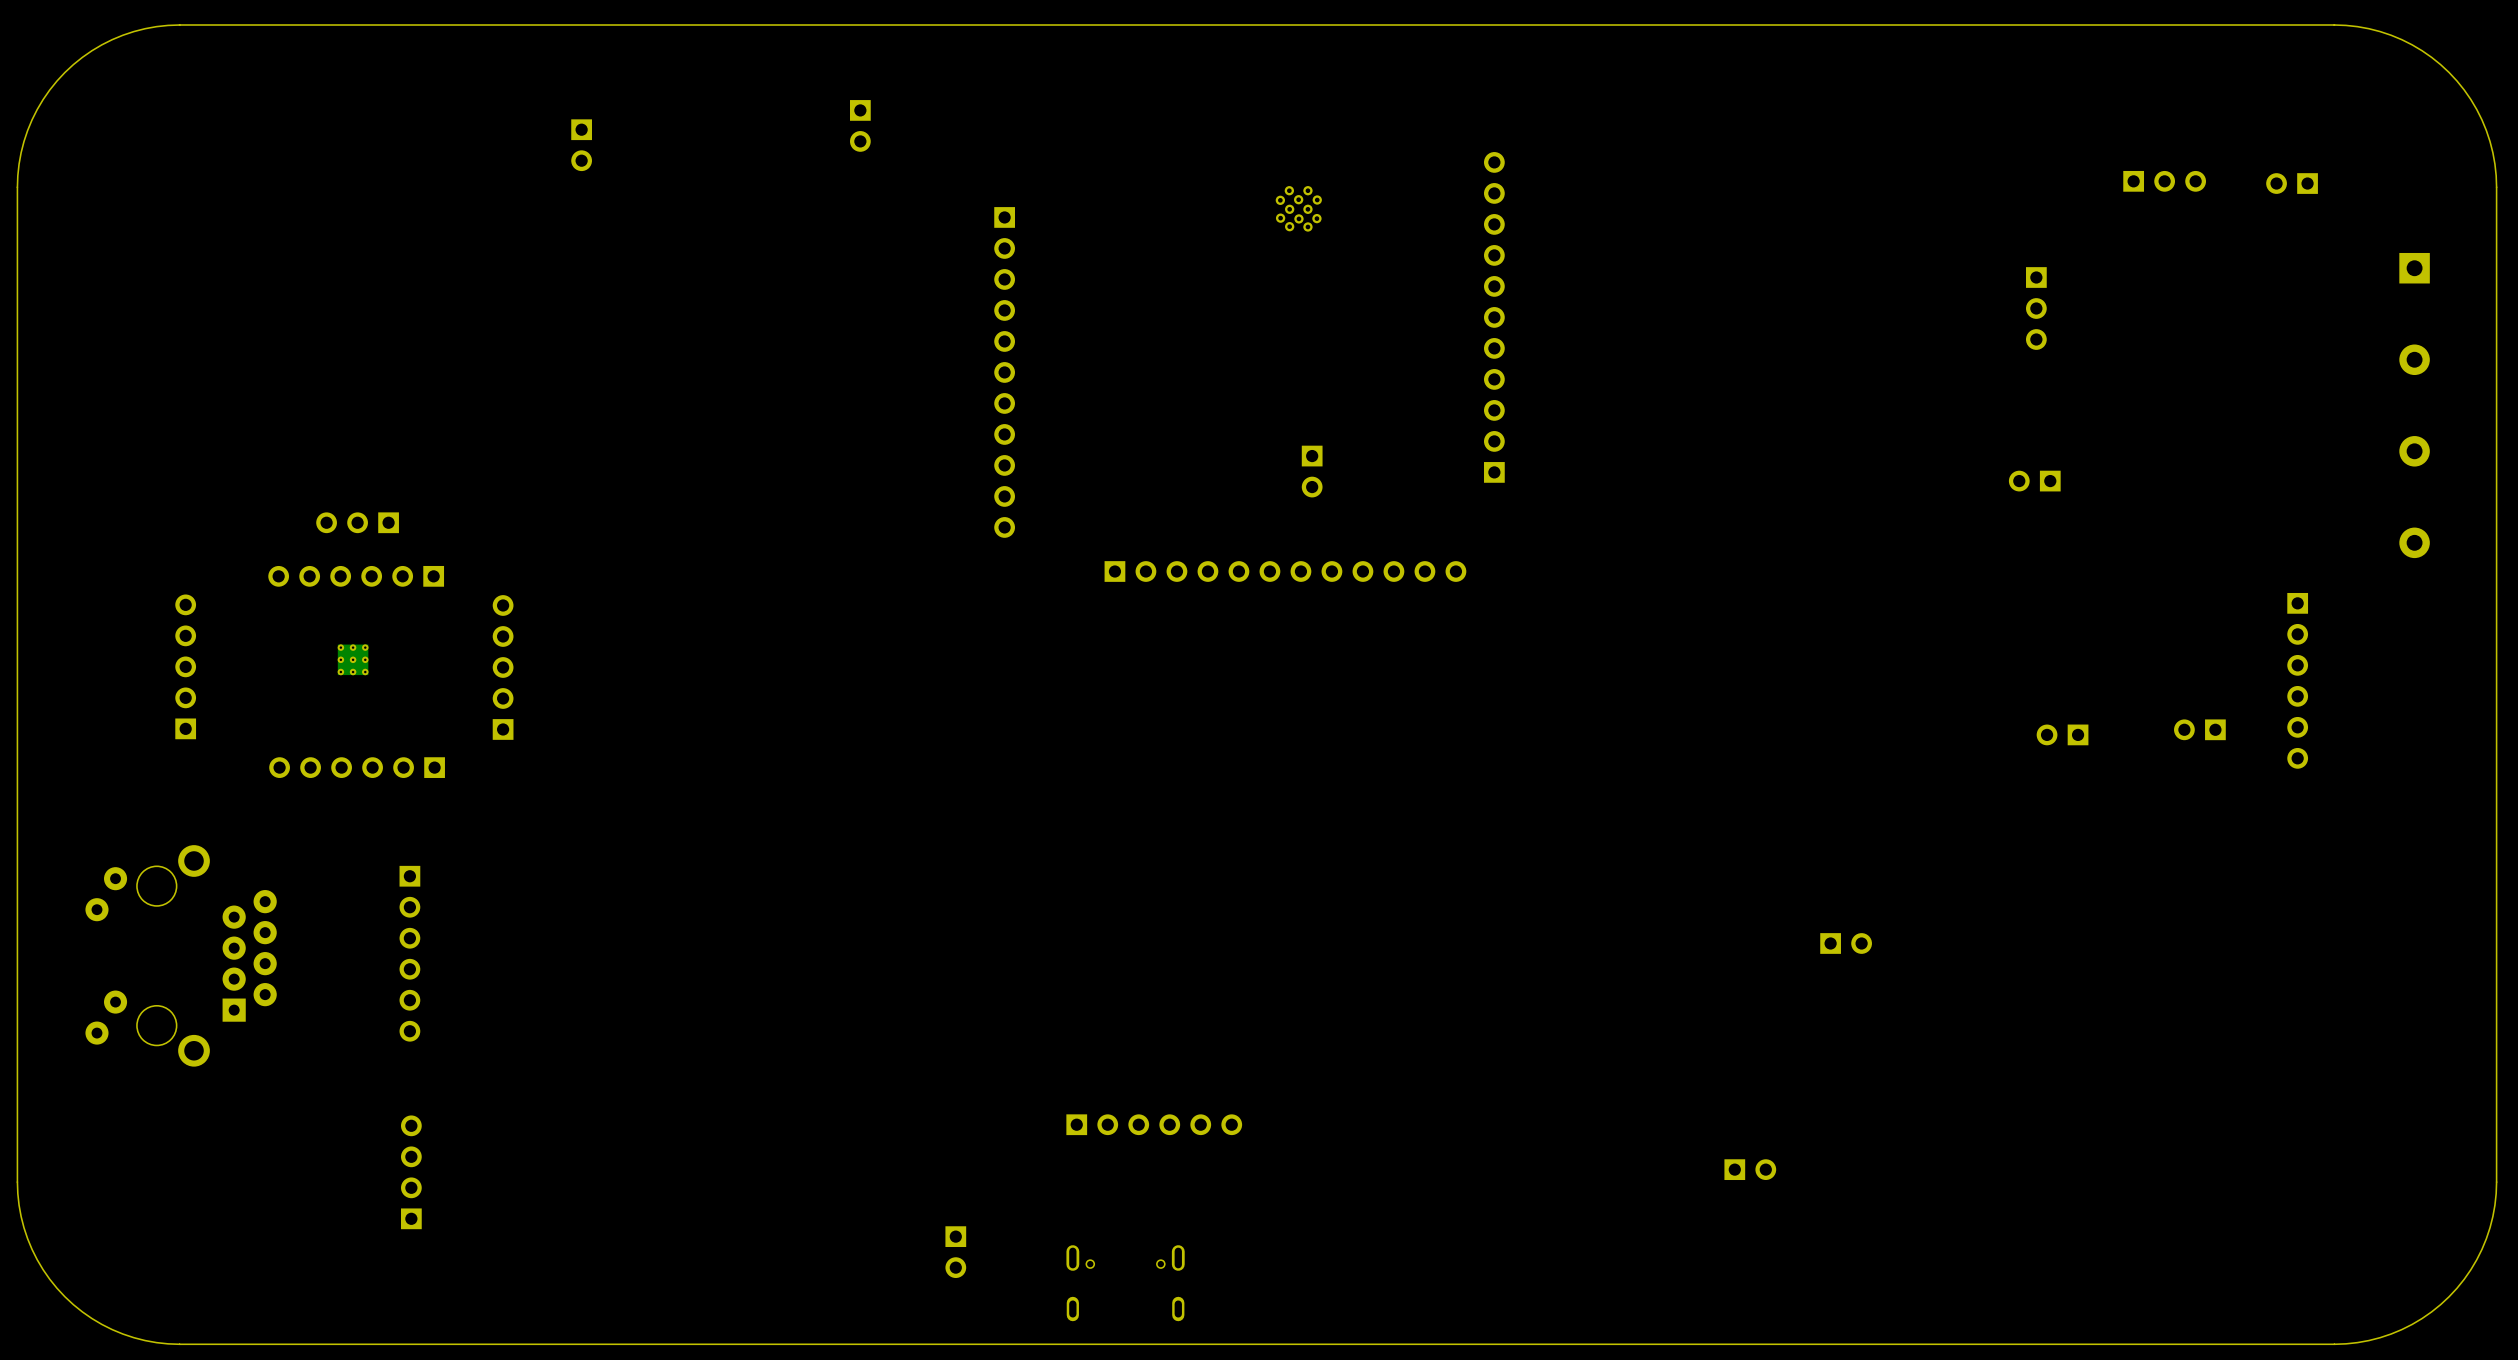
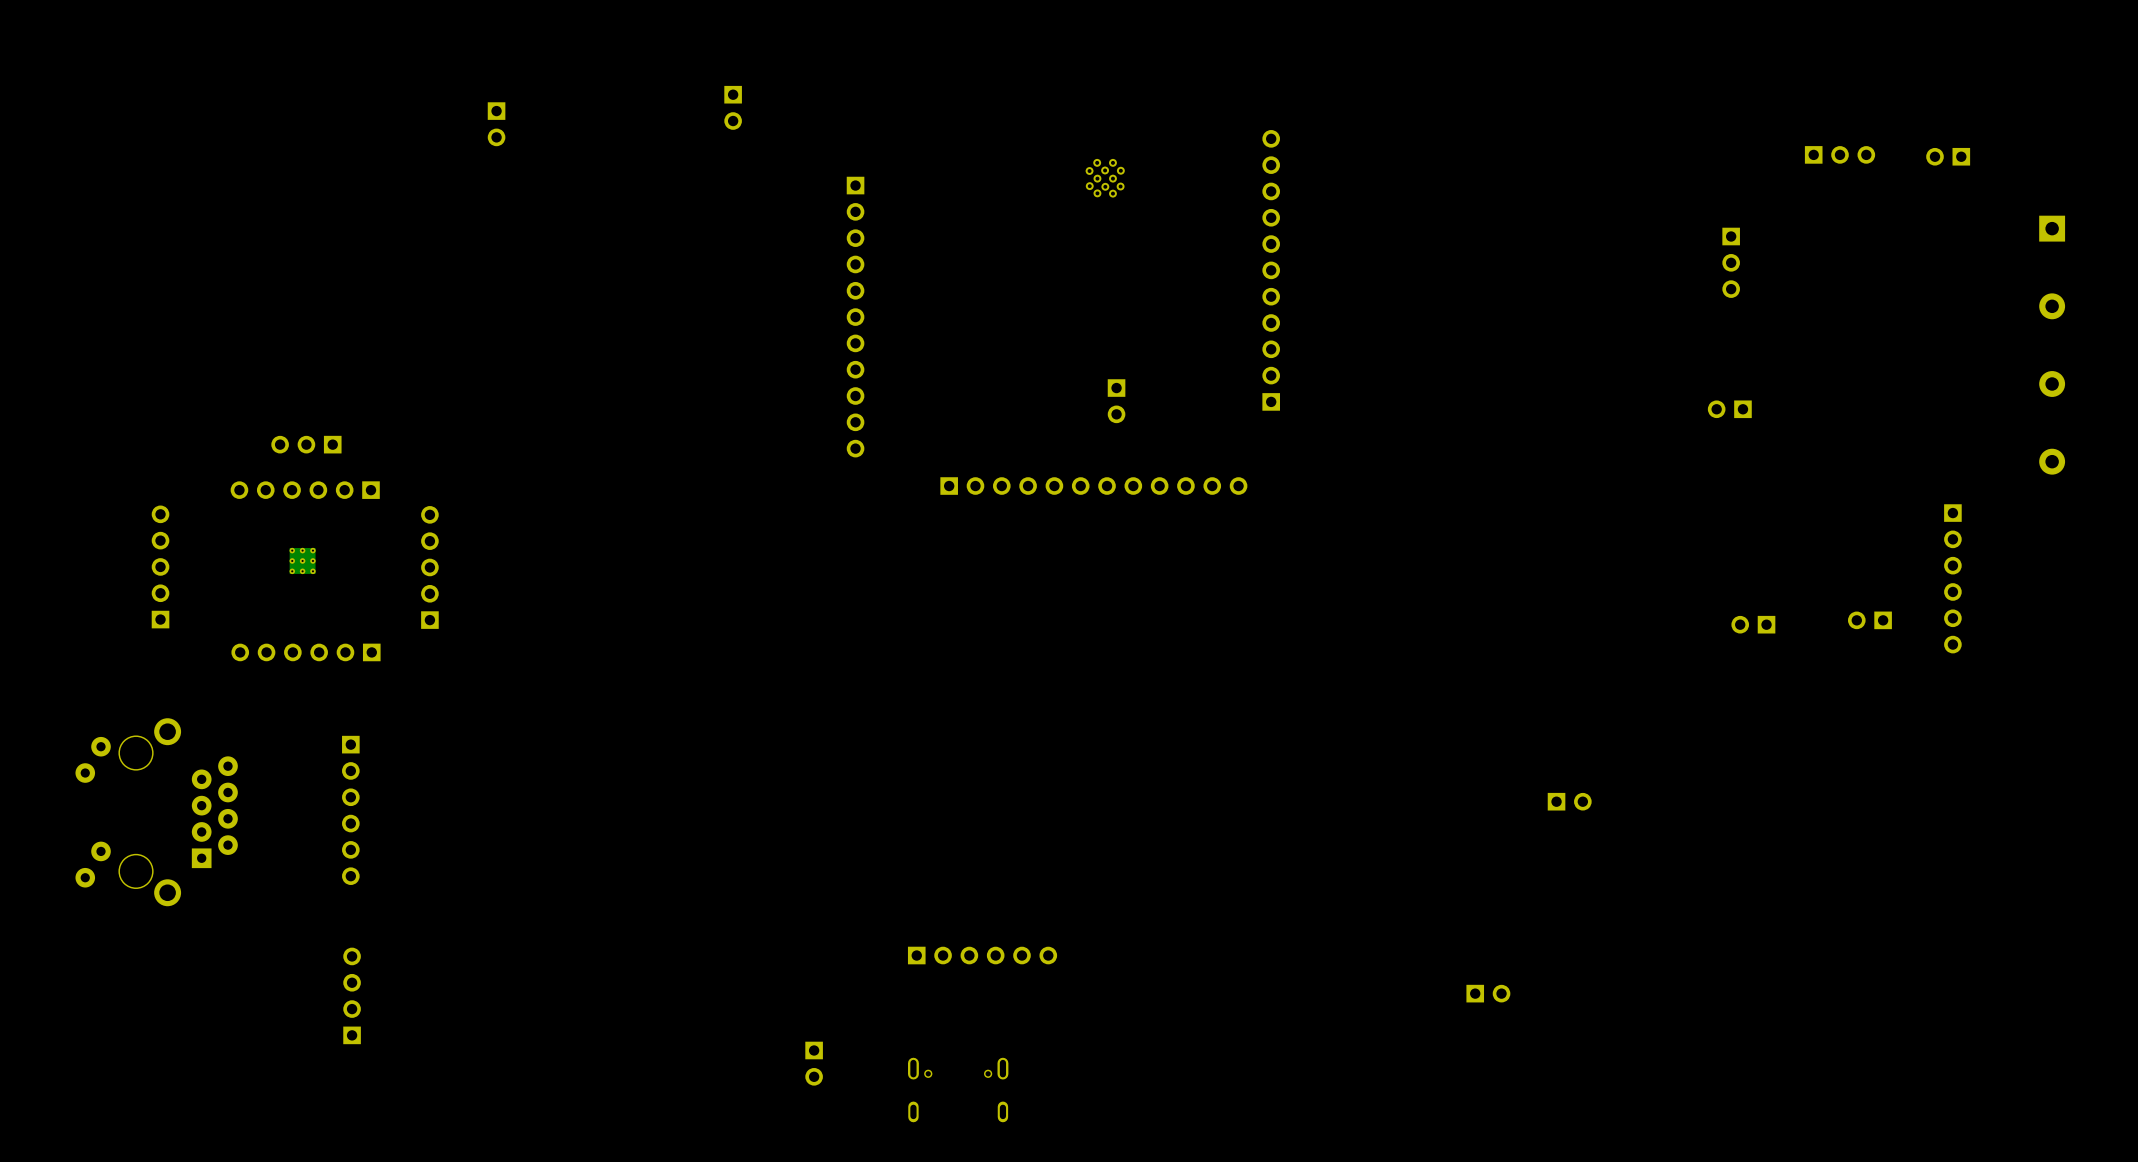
board edge: (2334, 25) (179, 25) (145, 28) (122, 35) (101, 44) (73, 64) (57, 80) (43, 99) (27, 130) (21, 152) (17, 175) (17, 1182) (19, 1205) (23, 1227) (37, 1259) (49, 1279) (64, 1296) (91, 1318) (112, 1329) (133, 1337) (156, 1342) (179, 1344) (2334, 1344) (2357, 1342) (2380, 1337) (2412, 1324) (2440, 1304) (2456, 1288) (2470, 1269) (2486, 1238) (2492, 1216) (2496, 1193) (2496, 175) (2490, 141) (2476, 109) (2464, 89) (2440, 64) (2422, 50) (2391, 35) (2357, 26) (2334, 25) -> none

